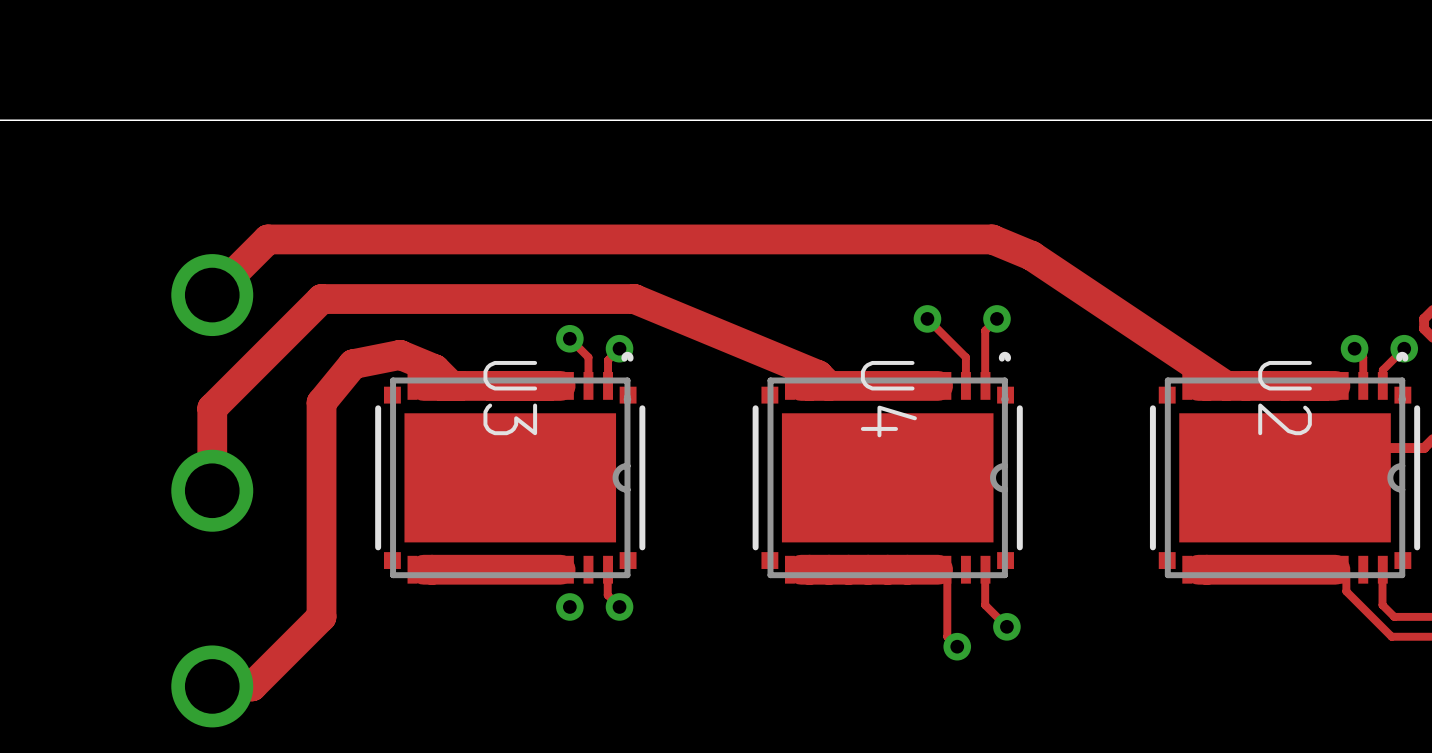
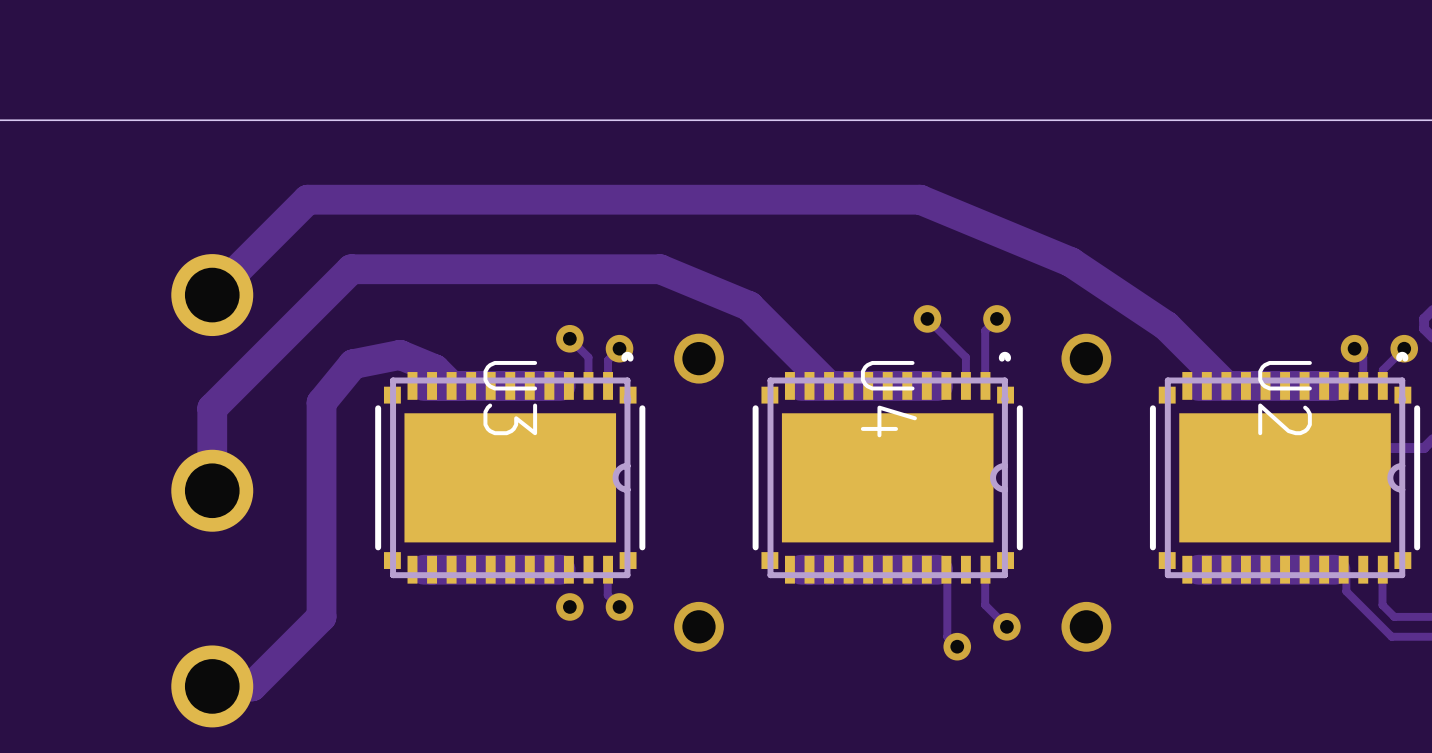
track: (267, 239) (992, 239) (1031, 255) (1226, 385) -> (267, 239) (307, 199) (920, 199) (1070, 262) (1166, 325) (1226, 385)
track: (321, 299) (634, 299) (818, 375) -> (321, 299) (351, 269) (660, 269) (749, 306) (818, 375)
via: none -> (698, 358)
via: none -> (1086, 358)
via: none -> (698, 626)
via: none -> (1086, 626)

